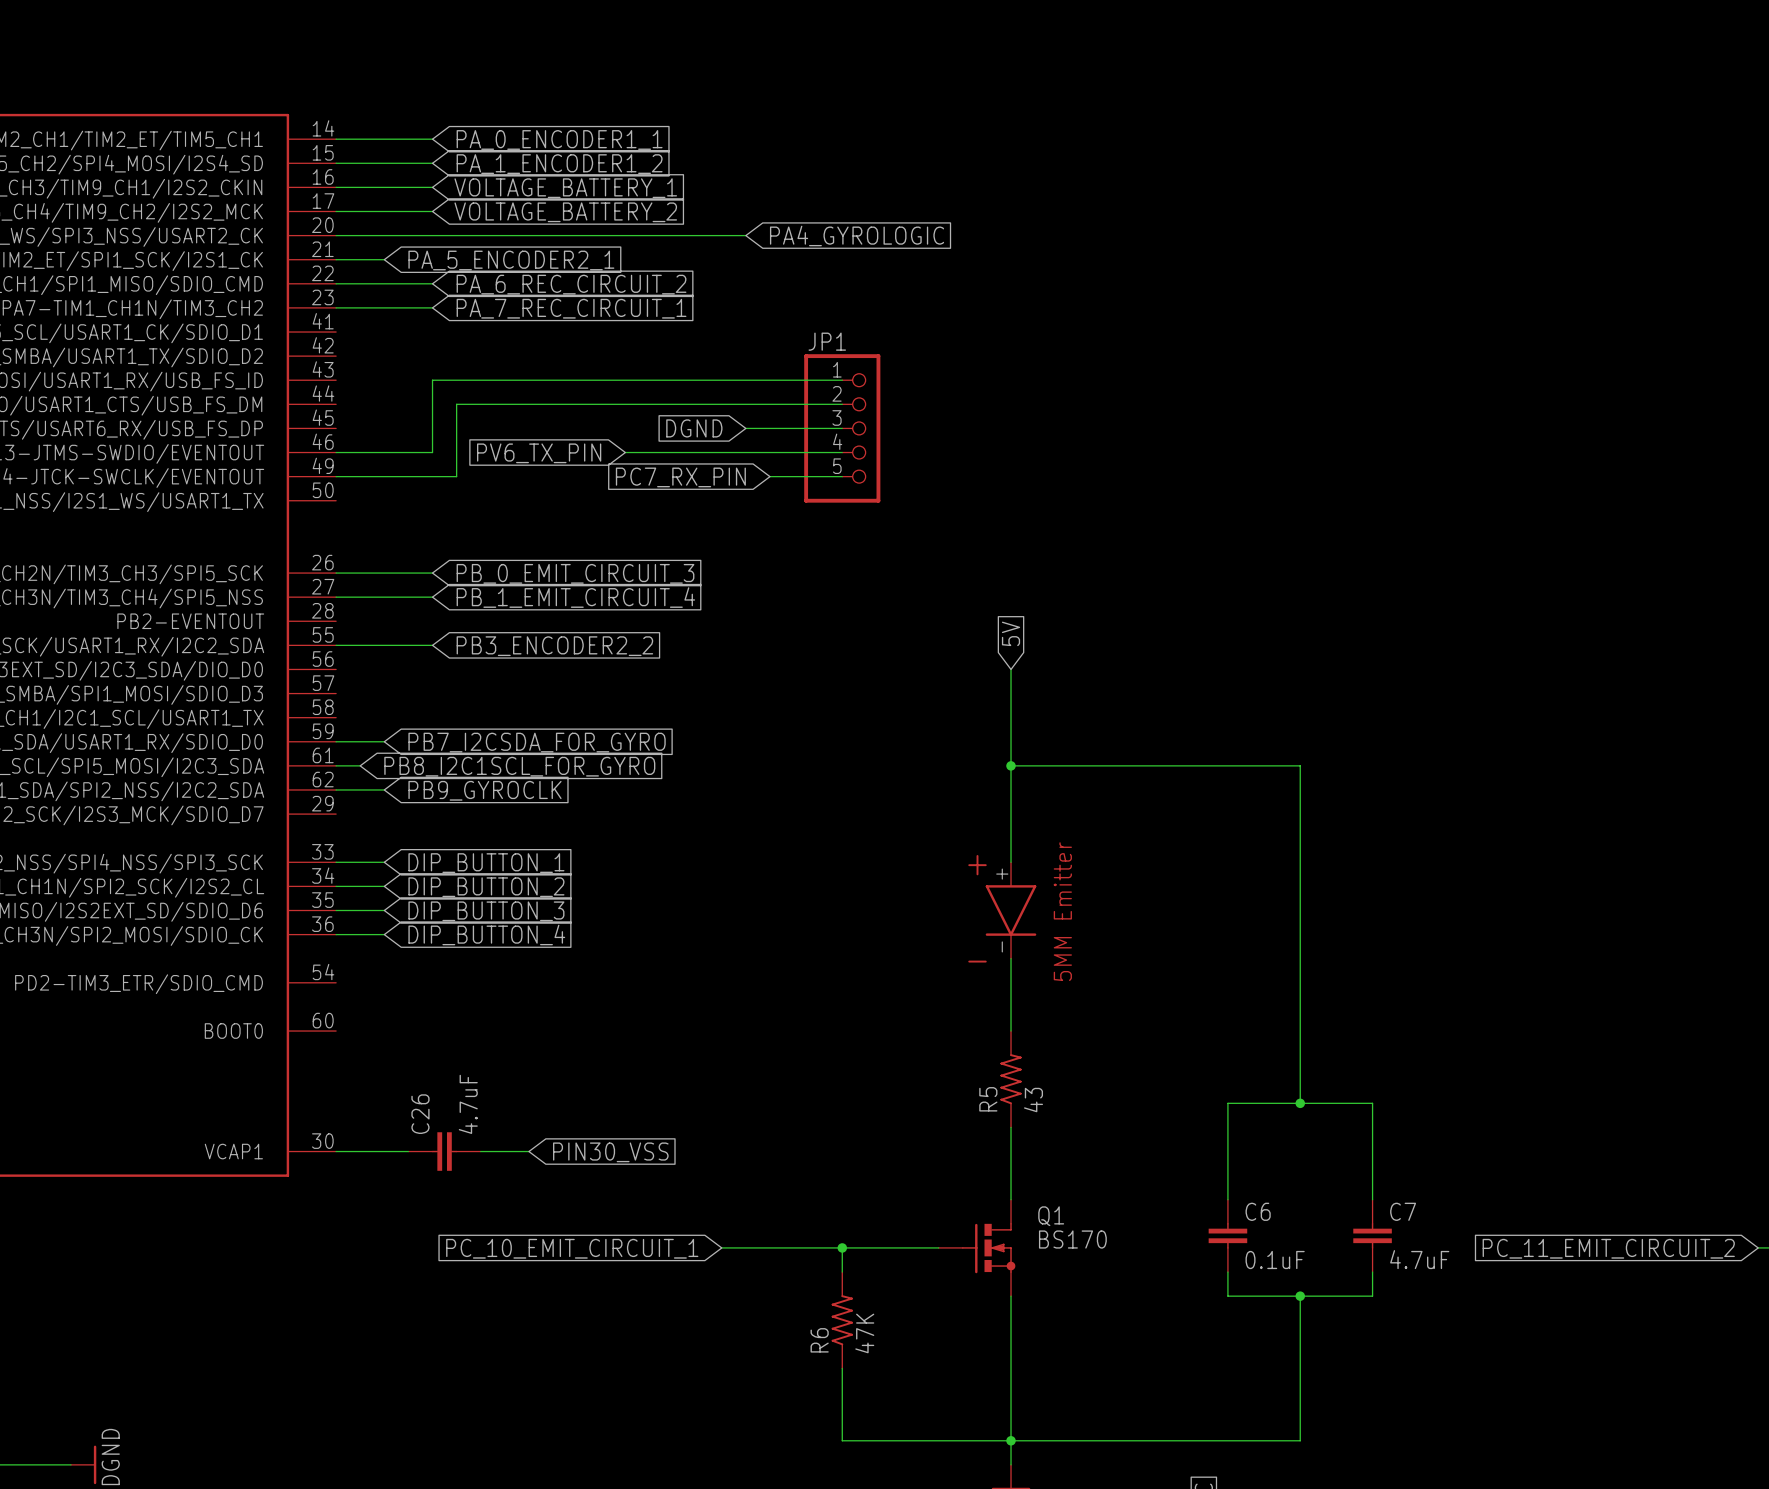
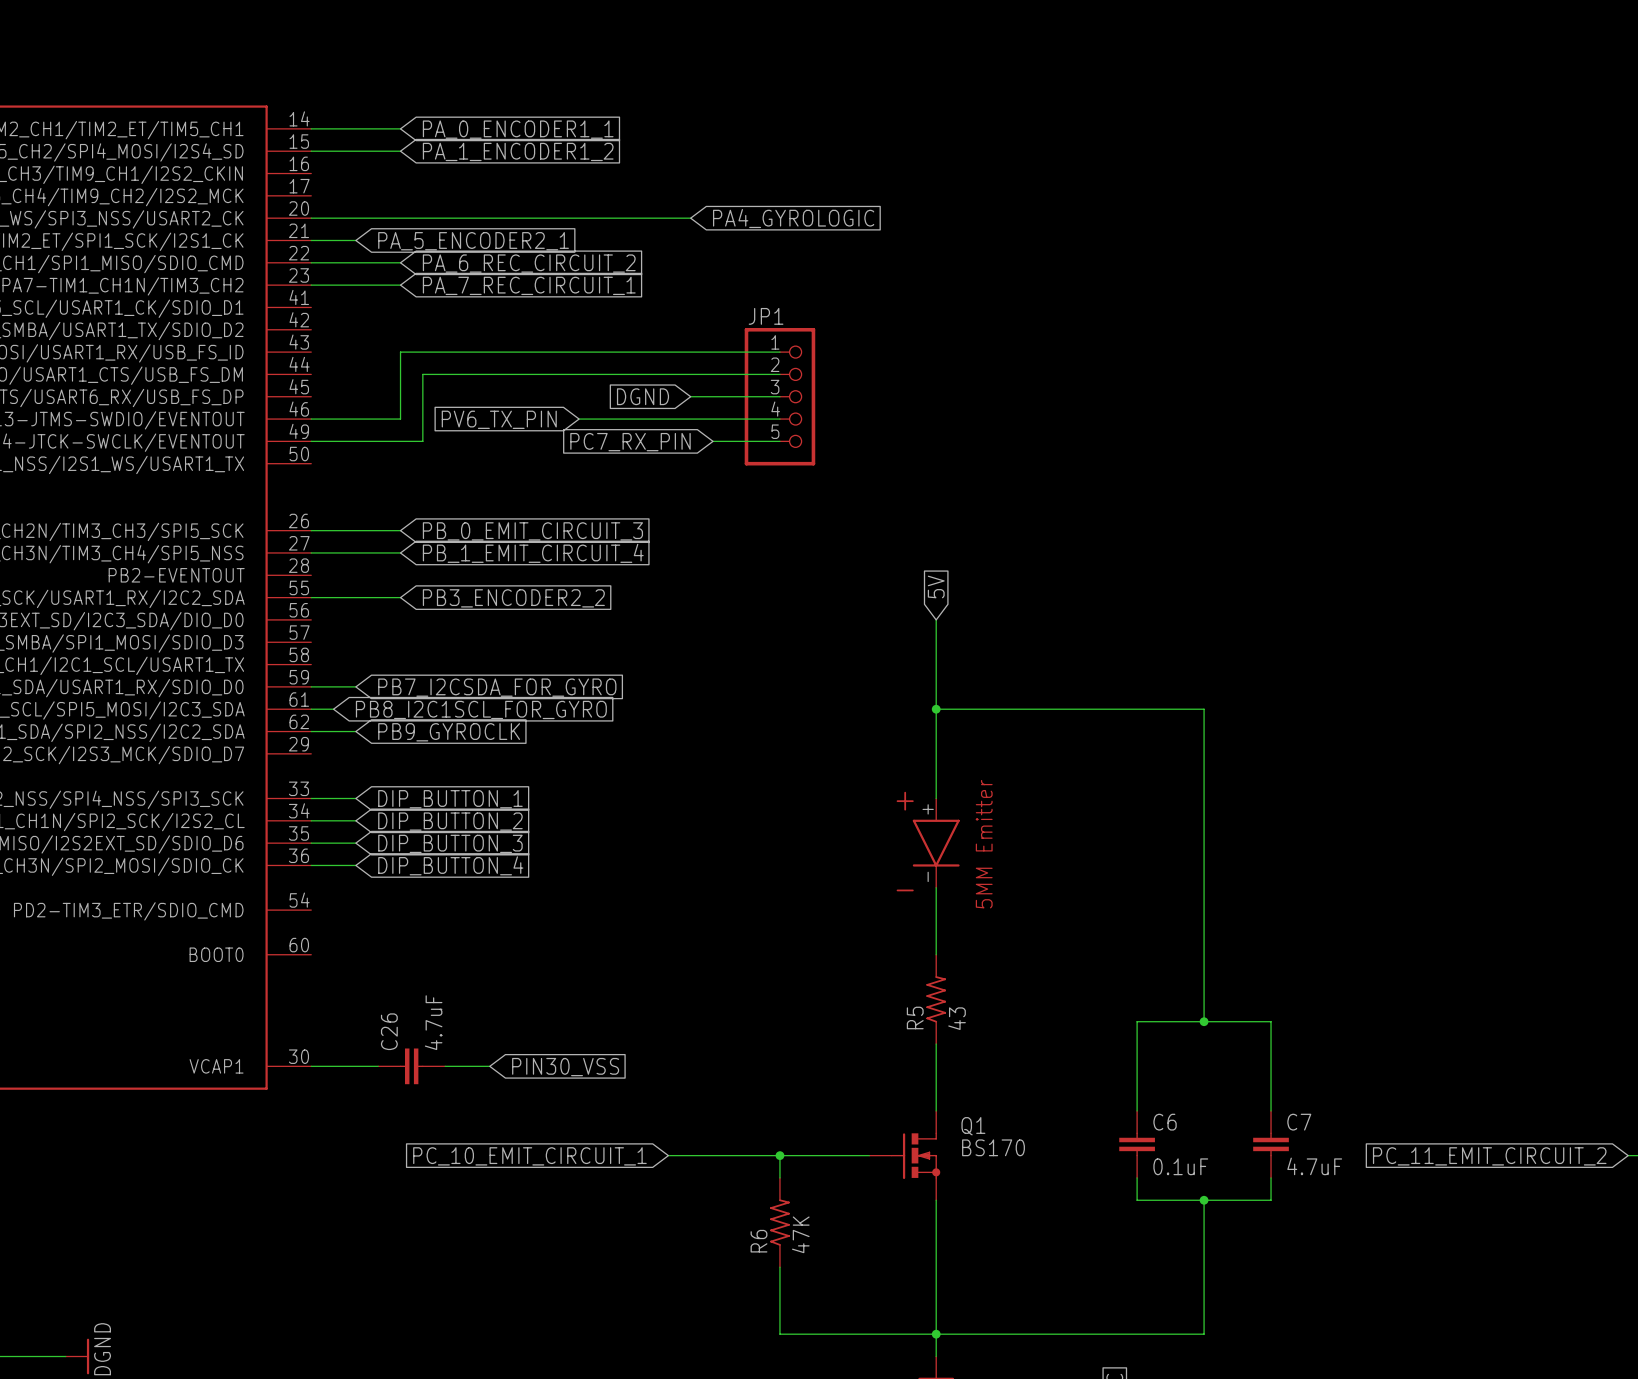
wire: (336, 187) (432, 187) -> none
global label: VOLTAGE_BATTERY_1 (565, 188) -> none
wire: (336, 211) (432, 211) -> none
global label: VOLTAGE_BATTERY_2 (565, 212) -> none

